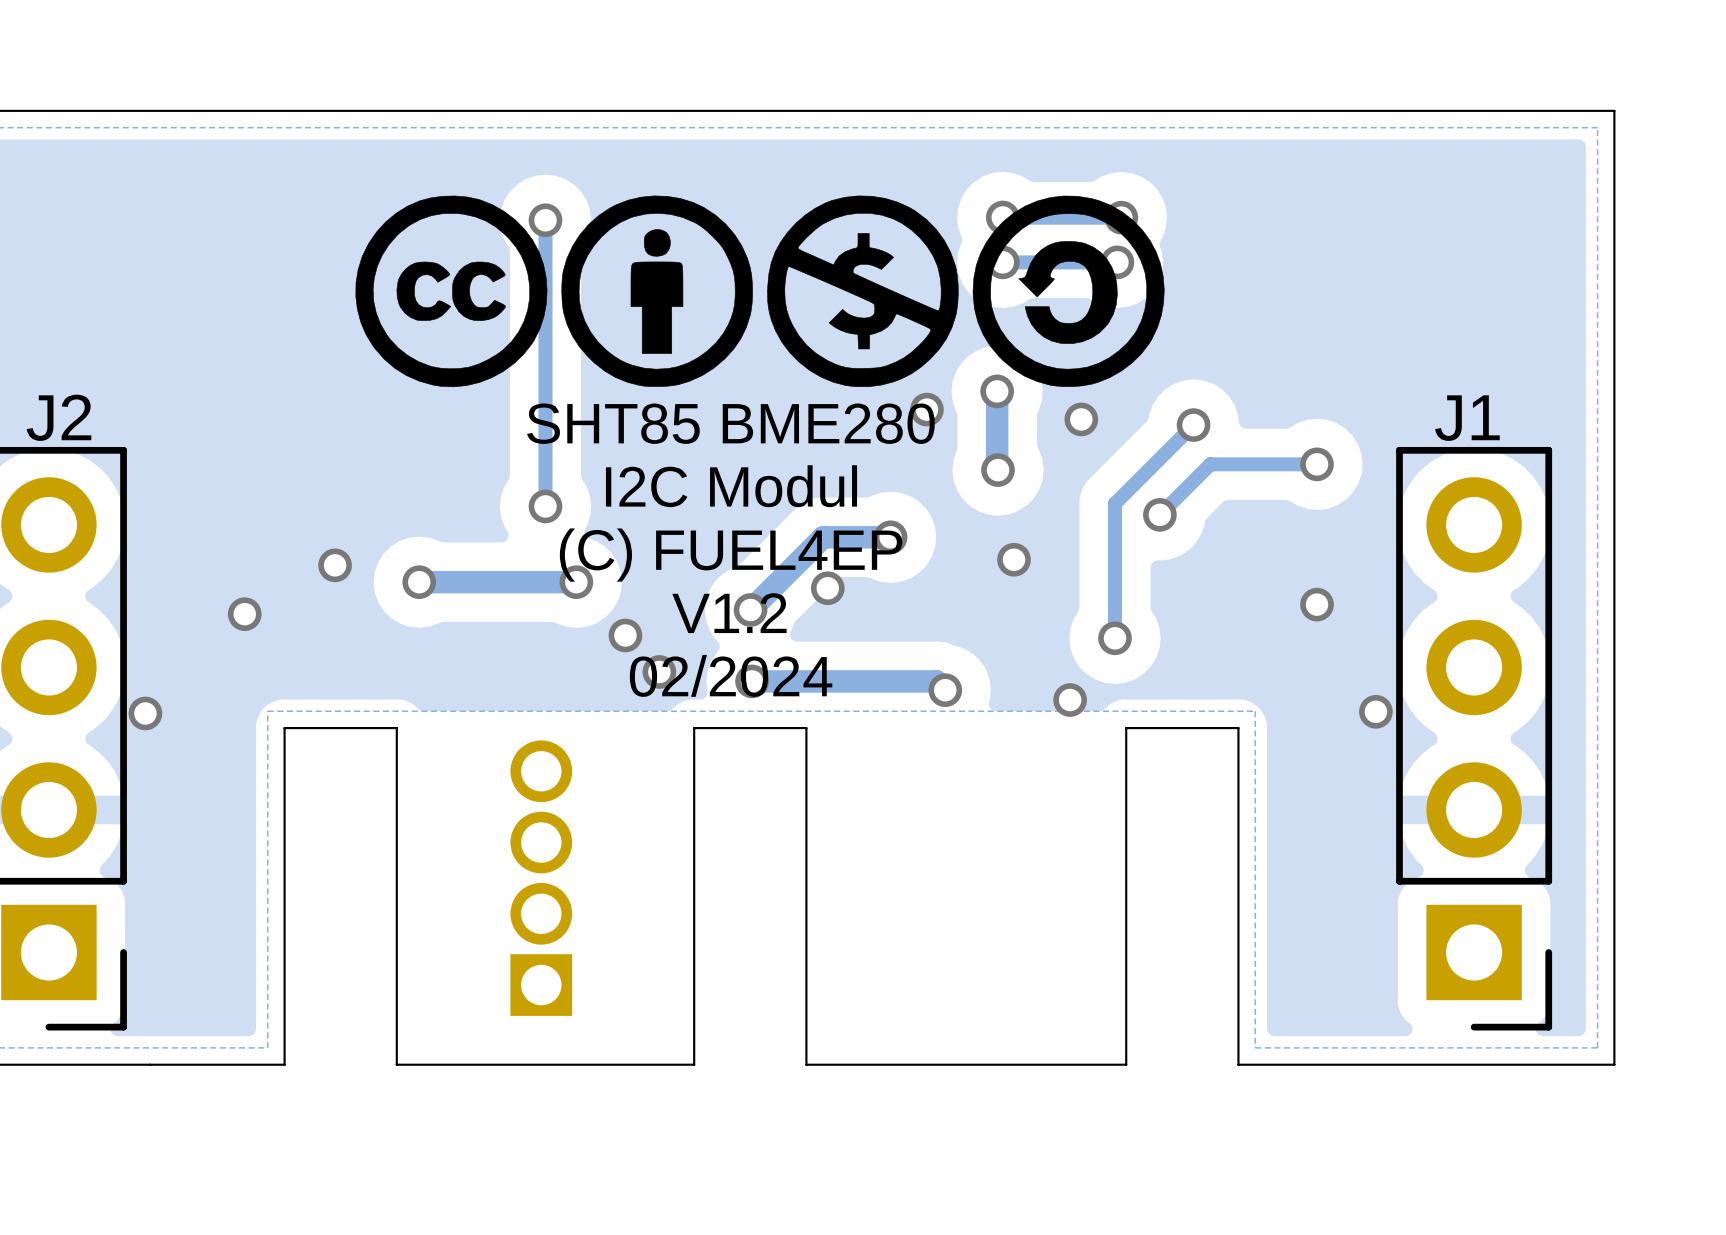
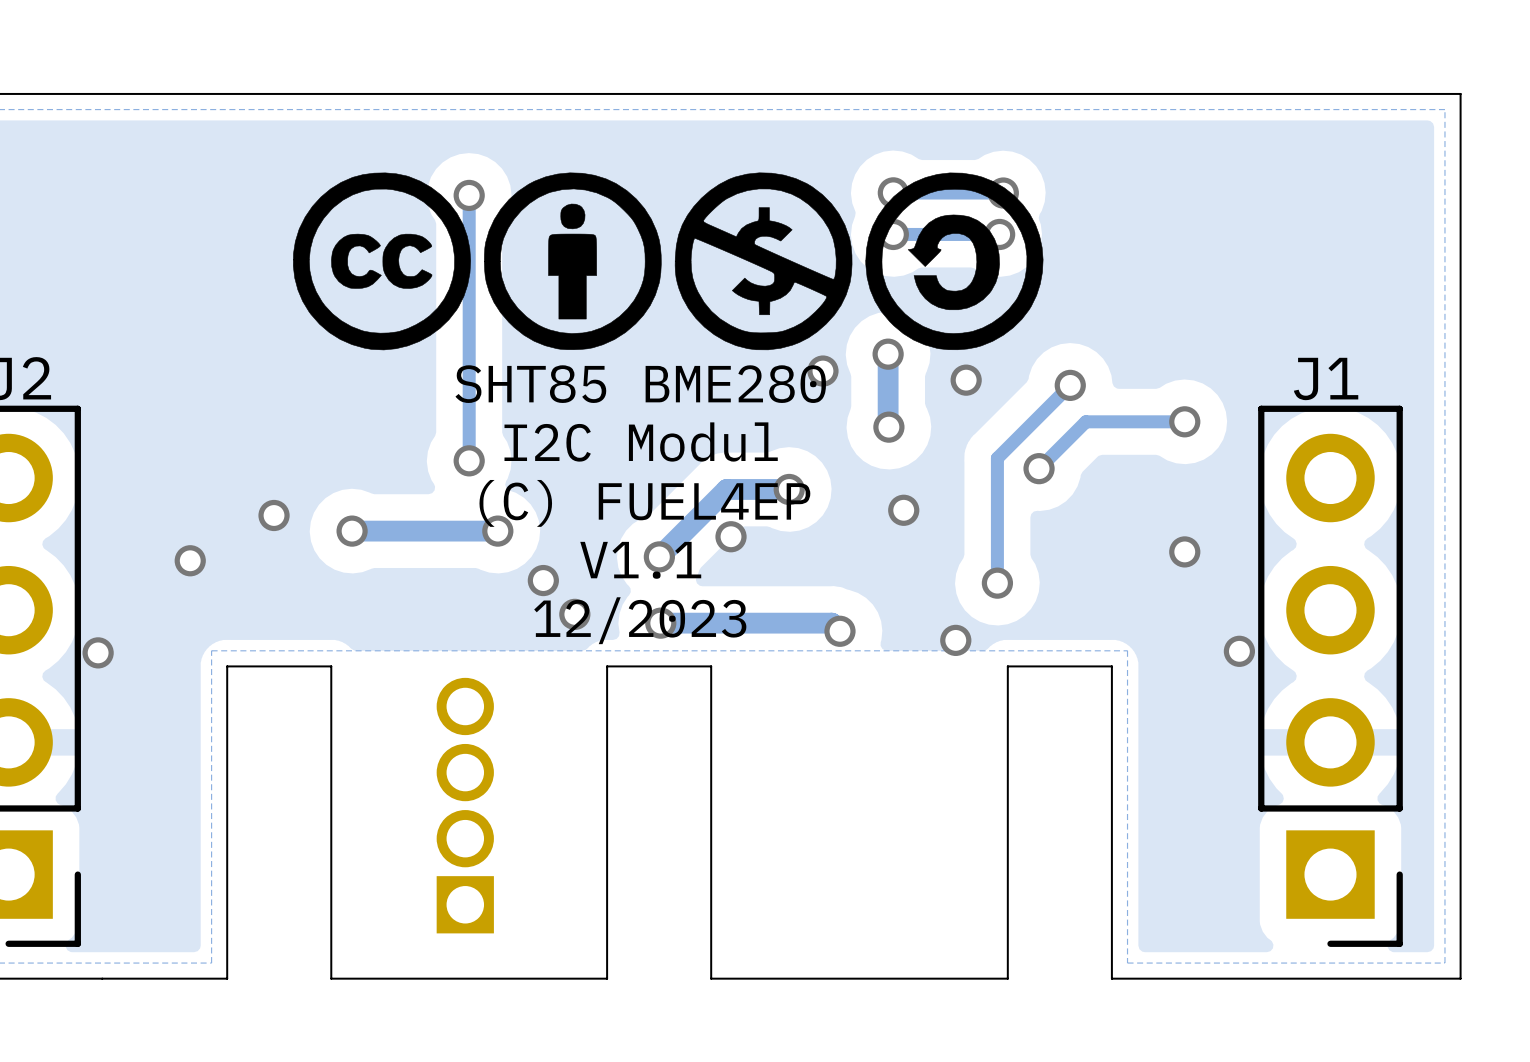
text: V1.2 (729, 613) -> V1.1 (640, 560)
text: 02/2024 (731, 675) -> 12/2023 (640, 620)

